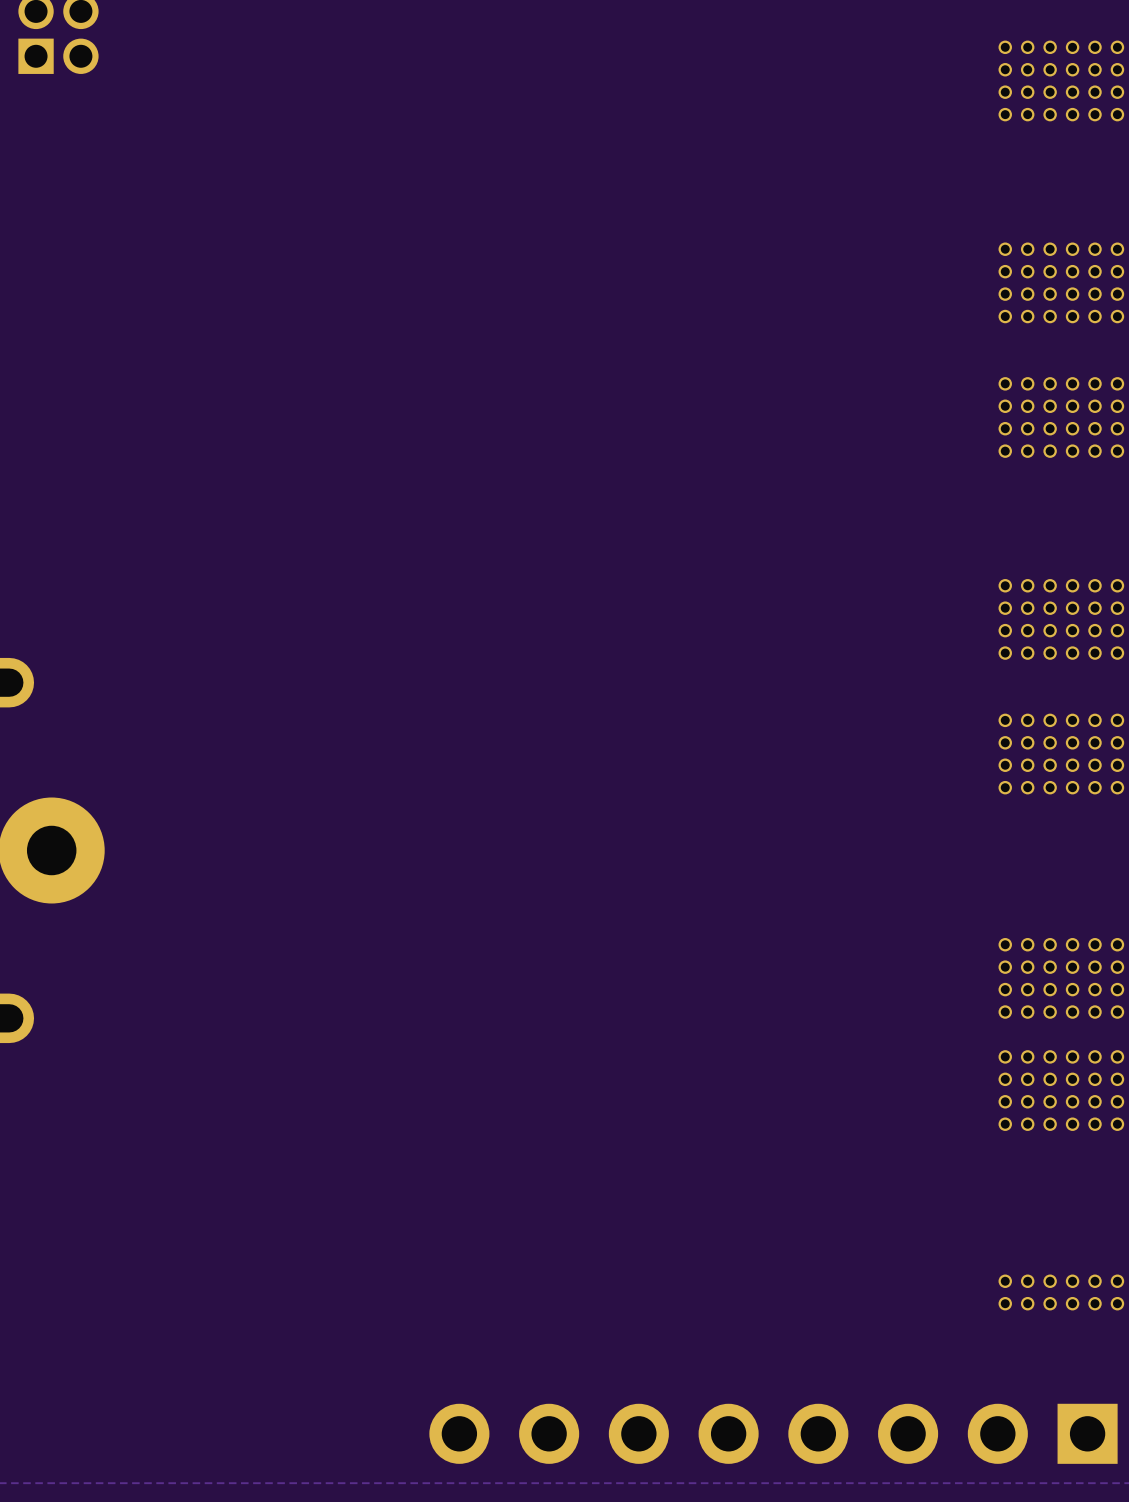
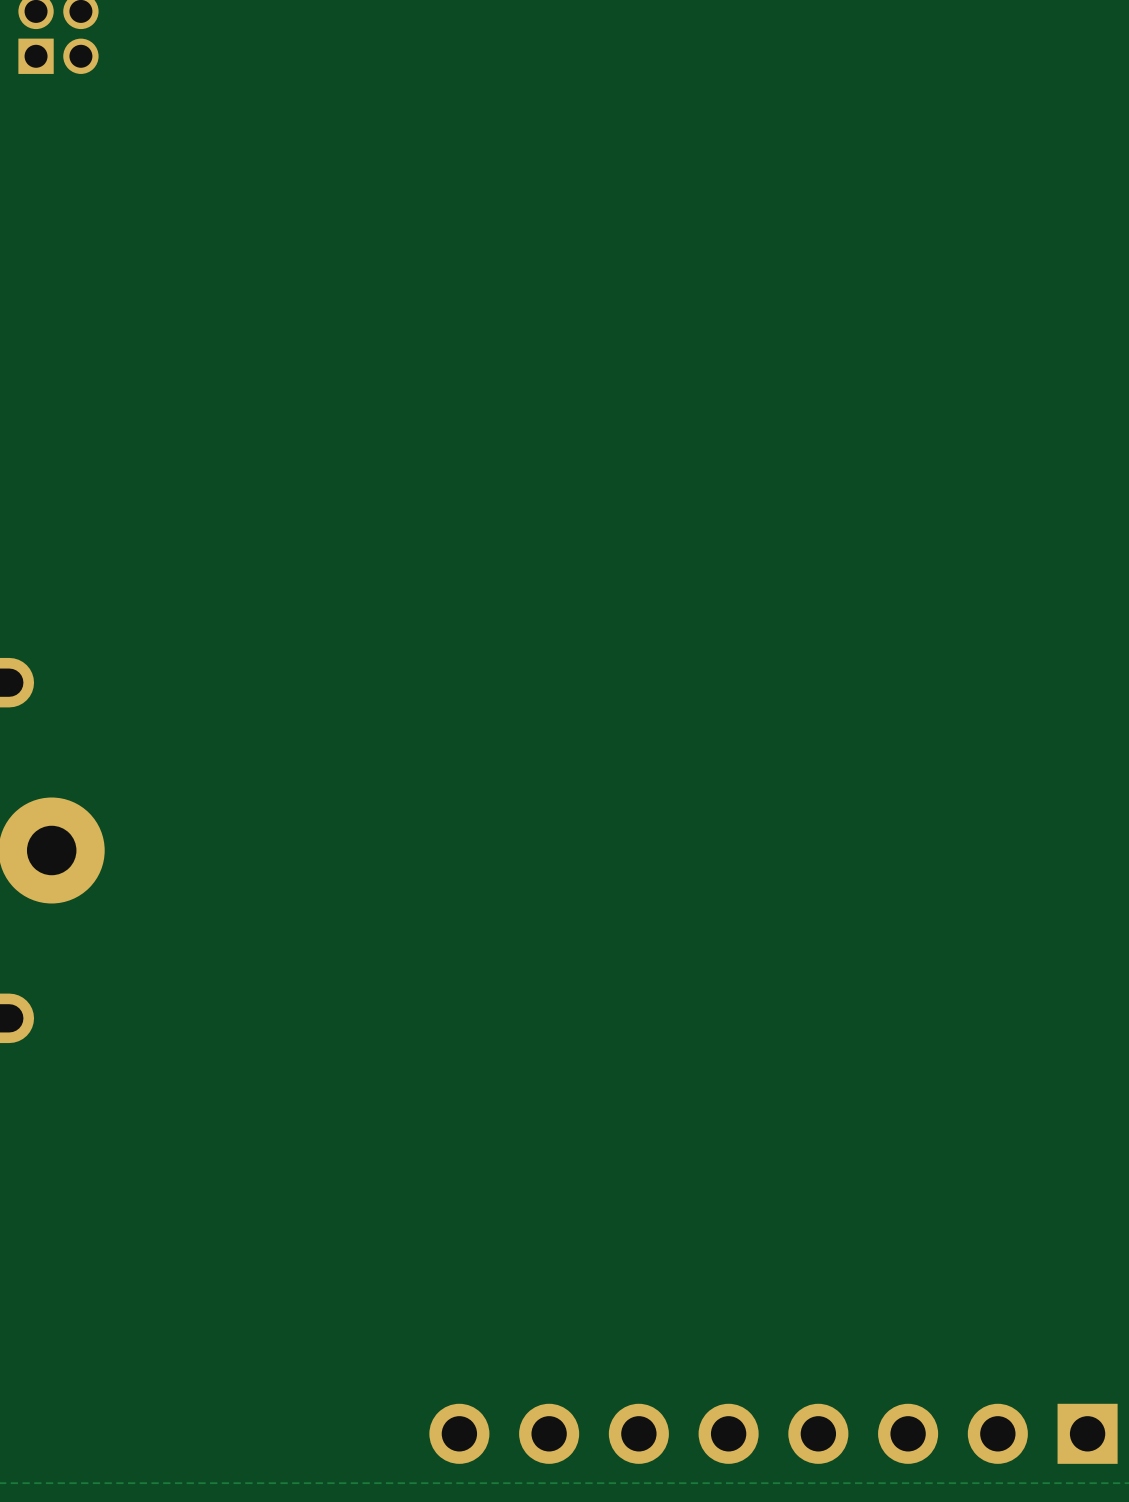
part: (1005, 47) -> none
part: (1027, 47) -> none
part: (1050, 47) -> none
part: (1072, 47) -> none
part: (1095, 47) -> none
part: (1117, 47) -> none
part: (1005, 69) -> none
part: (1027, 69) -> none
part: (1050, 69) -> none
part: (1072, 69) -> none
part: (1095, 69) -> none
part: (1117, 69) -> none
part: (1005, 92) -> none
part: (1027, 92) -> none
part: (1050, 92) -> none
part: (1072, 92) -> none
part: (1095, 92) -> none
part: (1117, 92) -> none
part: (1005, 114) -> none
part: (1027, 114) -> none
part: (1050, 114) -> none
part: (1072, 114) -> none
part: (1095, 114) -> none
part: (1117, 114) -> none
part: (1005, 249) -> none
part: (1027, 249) -> none
part: (1050, 249) -> none
part: (1072, 249) -> none
part: (1095, 249) -> none
part: (1117, 249) -> none
part: (1005, 271) -> none
part: (1027, 271) -> none
part: (1050, 271) -> none
part: (1072, 271) -> none
part: (1095, 271) -> none
part: (1117, 271) -> none
part: (1005, 294) -> none
part: (1027, 294) -> none
part: (1050, 294) -> none
part: (1072, 294) -> none
part: (1095, 294) -> none
part: (1117, 294) -> none
part: (1005, 316) -> none
part: (1027, 316) -> none
part: (1050, 316) -> none
part: (1072, 316) -> none
part: (1095, 316) -> none
part: (1117, 316) -> none
part: (1005, 383) -> none
part: (1027, 383) -> none
part: (1050, 383) -> none
part: (1072, 383) -> none
part: (1095, 383) -> none
part: (1117, 383) -> none
part: (1005, 406) -> none
part: (1027, 406) -> none
part: (1050, 406) -> none
part: (1072, 406) -> none
part: (1095, 406) -> none
part: (1117, 406) -> none
part: (1005, 428) -> none
part: (1027, 428) -> none
part: (1050, 428) -> none
part: (1072, 428) -> none
part: (1095, 428) -> none
part: (1117, 428) -> none
part: (1005, 451) -> none
part: (1027, 451) -> none
part: (1050, 451) -> none
part: (1072, 451) -> none
part: (1095, 451) -> none
part: (1117, 451) -> none
part: (1005, 585) -> none
part: (1027, 585) -> none
part: (1050, 585) -> none
part: (1072, 585) -> none
part: (1095, 585) -> none
part: (1117, 585) -> none
part: (1005, 608) -> none
part: (1027, 608) -> none
part: (1050, 608) -> none
part: (1072, 608) -> none
part: (1095, 608) -> none
part: (1117, 608) -> none
part: (1005, 630) -> none
part: (1027, 630) -> none
part: (1050, 630) -> none
part: (1072, 630) -> none
part: (1095, 630) -> none
part: (1117, 630) -> none
part: (1005, 653) -> none
part: (1027, 653) -> none
part: (1050, 653) -> none
part: (1072, 653) -> none
part: (1095, 653) -> none
part: (1117, 653) -> none
part: (1005, 720) -> none
part: (1027, 720) -> none
part: (1050, 720) -> none
part: (1072, 720) -> none
part: (1095, 720) -> none
part: (1117, 720) -> none
part: (1005, 742) -> none
part: (1027, 742) -> none
part: (1050, 742) -> none
part: (1072, 742) -> none
part: (1095, 742) -> none
part: (1117, 742) -> none
part: (1005, 765) -> none
part: (1027, 765) -> none
part: (1050, 765) -> none
part: (1072, 765) -> none
part: (1095, 765) -> none
part: (1117, 765) -> none
part: (1005, 787) -> none
part: (1027, 787) -> none
part: (1050, 787) -> none
part: (1072, 787) -> none
part: (1095, 787) -> none
part: (1117, 787) -> none
part: (1005, 944) -> none
part: (1027, 944) -> none
part: (1050, 944) -> none
part: (1072, 944) -> none
part: (1095, 944) -> none
part: (1117, 944) -> none
part: (1005, 967) -> none
part: (1027, 967) -> none
part: (1050, 967) -> none
part: (1072, 967) -> none
part: (1095, 967) -> none
part: (1117, 967) -> none
part: (1005, 989) -> none
part: (1027, 989) -> none
part: (1050, 989) -> none
part: (1072, 989) -> none
part: (1095, 989) -> none
part: (1117, 989) -> none
part: (1005, 1012) -> none
part: (1027, 1012) -> none
part: (1050, 1012) -> none
part: (1072, 1012) -> none
part: (1095, 1012) -> none
part: (1117, 1012) -> none
part: (1005, 1056) -> none
part: (1027, 1056) -> none
part: (1050, 1056) -> none
part: (1072, 1056) -> none
part: (1095, 1056) -> none
part: (1117, 1056) -> none
part: (1005, 1079) -> none
part: (1027, 1079) -> none
part: (1050, 1079) -> none
part: (1072, 1079) -> none
part: (1095, 1079) -> none
part: (1117, 1079) -> none
part: (1005, 1101) -> none
part: (1027, 1101) -> none
part: (1050, 1101) -> none
part: (1072, 1101) -> none
part: (1095, 1101) -> none
part: (1117, 1101) -> none
part: (1005, 1124) -> none
part: (1027, 1124) -> none
part: (1050, 1124) -> none
part: (1072, 1124) -> none
part: (1095, 1124) -> none
part: (1117, 1124) -> none
part: (1005, 1281) -> none
part: (1027, 1281) -> none
part: (1050, 1281) -> none
part: (1072, 1281) -> none
part: (1095, 1281) -> none
part: (1117, 1281) -> none
part: (1005, 1303) -> none
part: (1027, 1303) -> none
part: (1050, 1303) -> none
part: (1072, 1303) -> none
part: (1095, 1303) -> none
part: (1117, 1303) -> none

